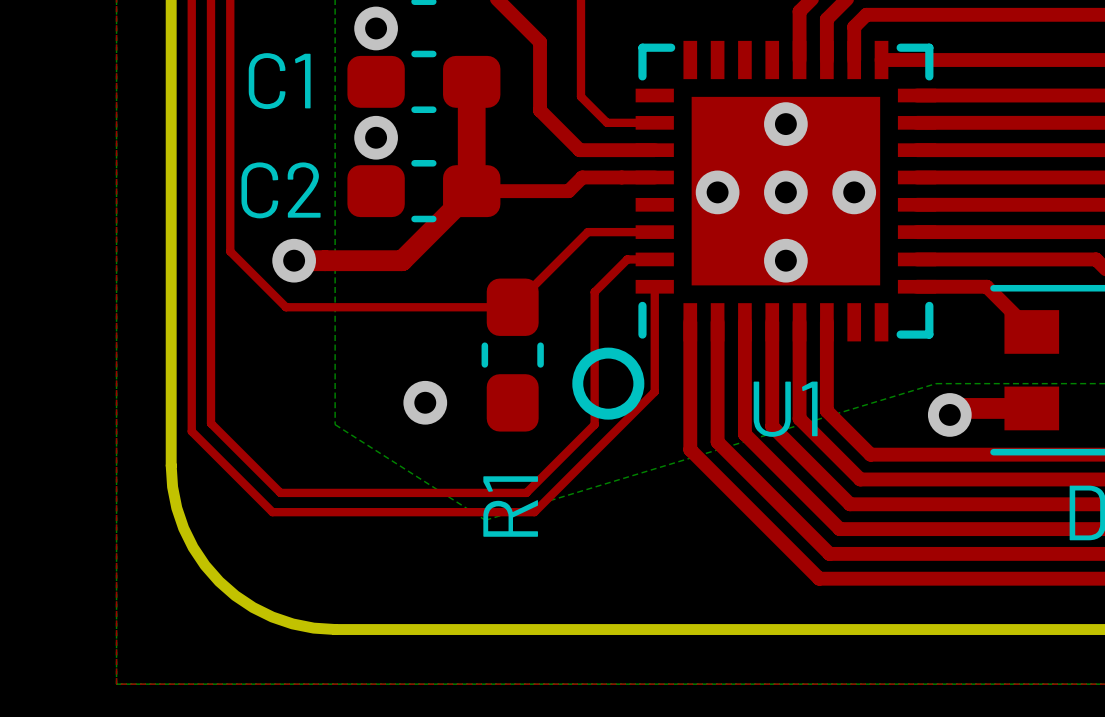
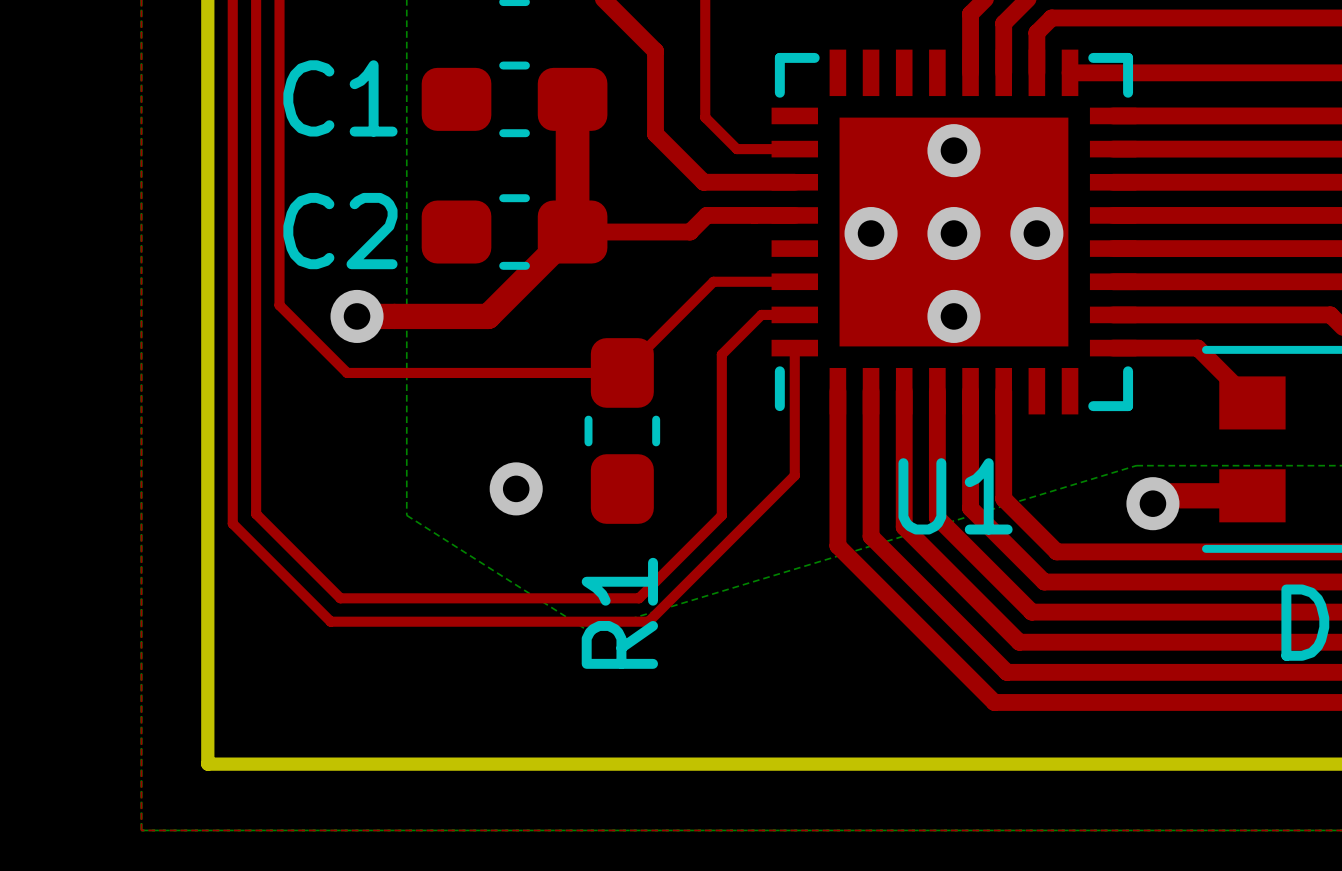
via: (376, 28) -> none
via: (376, 137) -> none
drawing: [572, 347, 645, 420] -> none
board edge: (171, 465) (172, 486) (183, 528) (193, 547) (219, 581) (253, 607) (272, 617) (313, 628) (335, 629) -> (207, 565) (207, 764) (406, 764)

